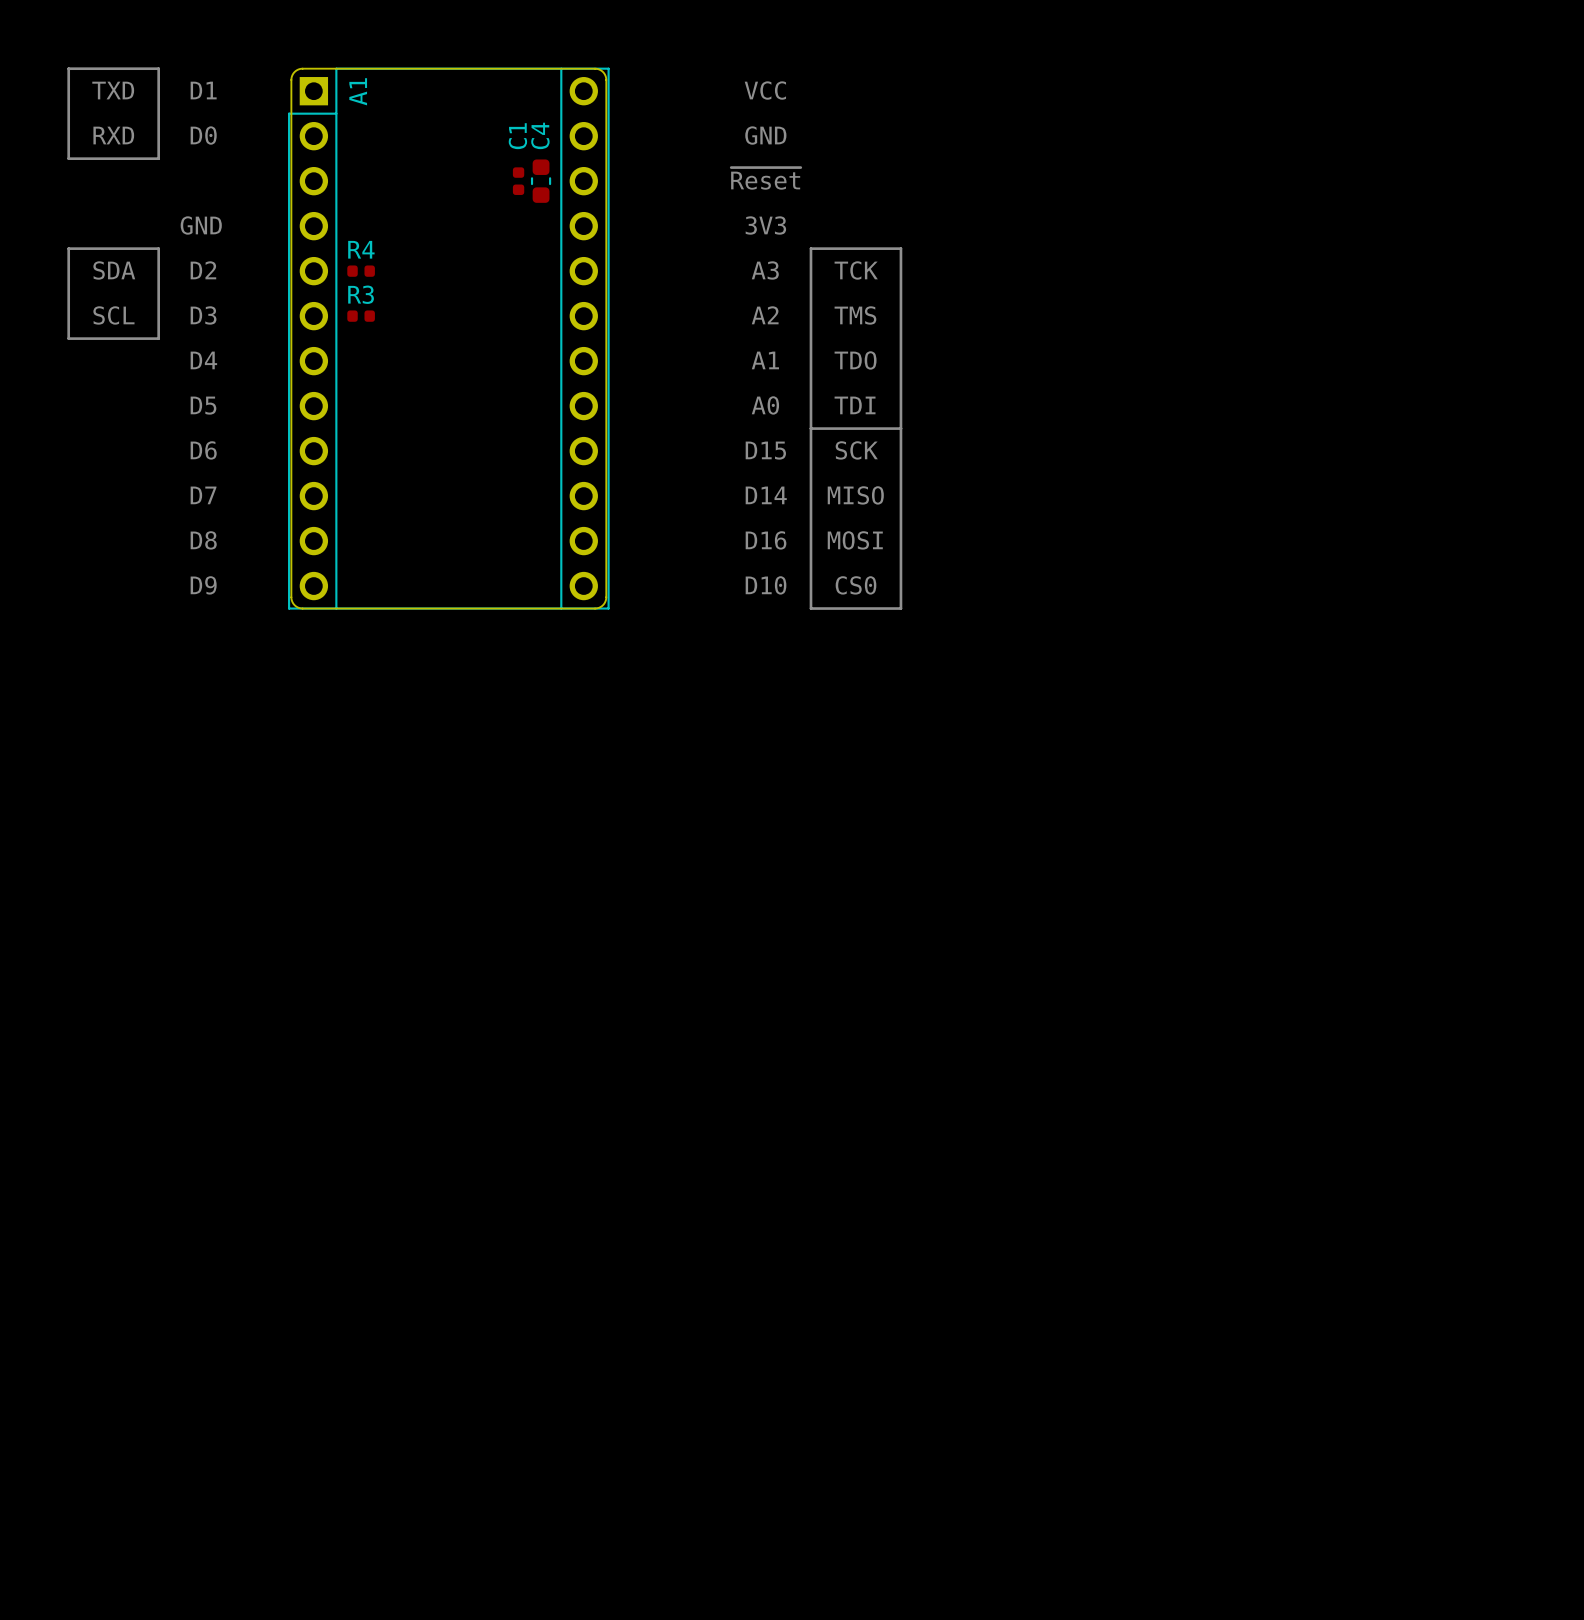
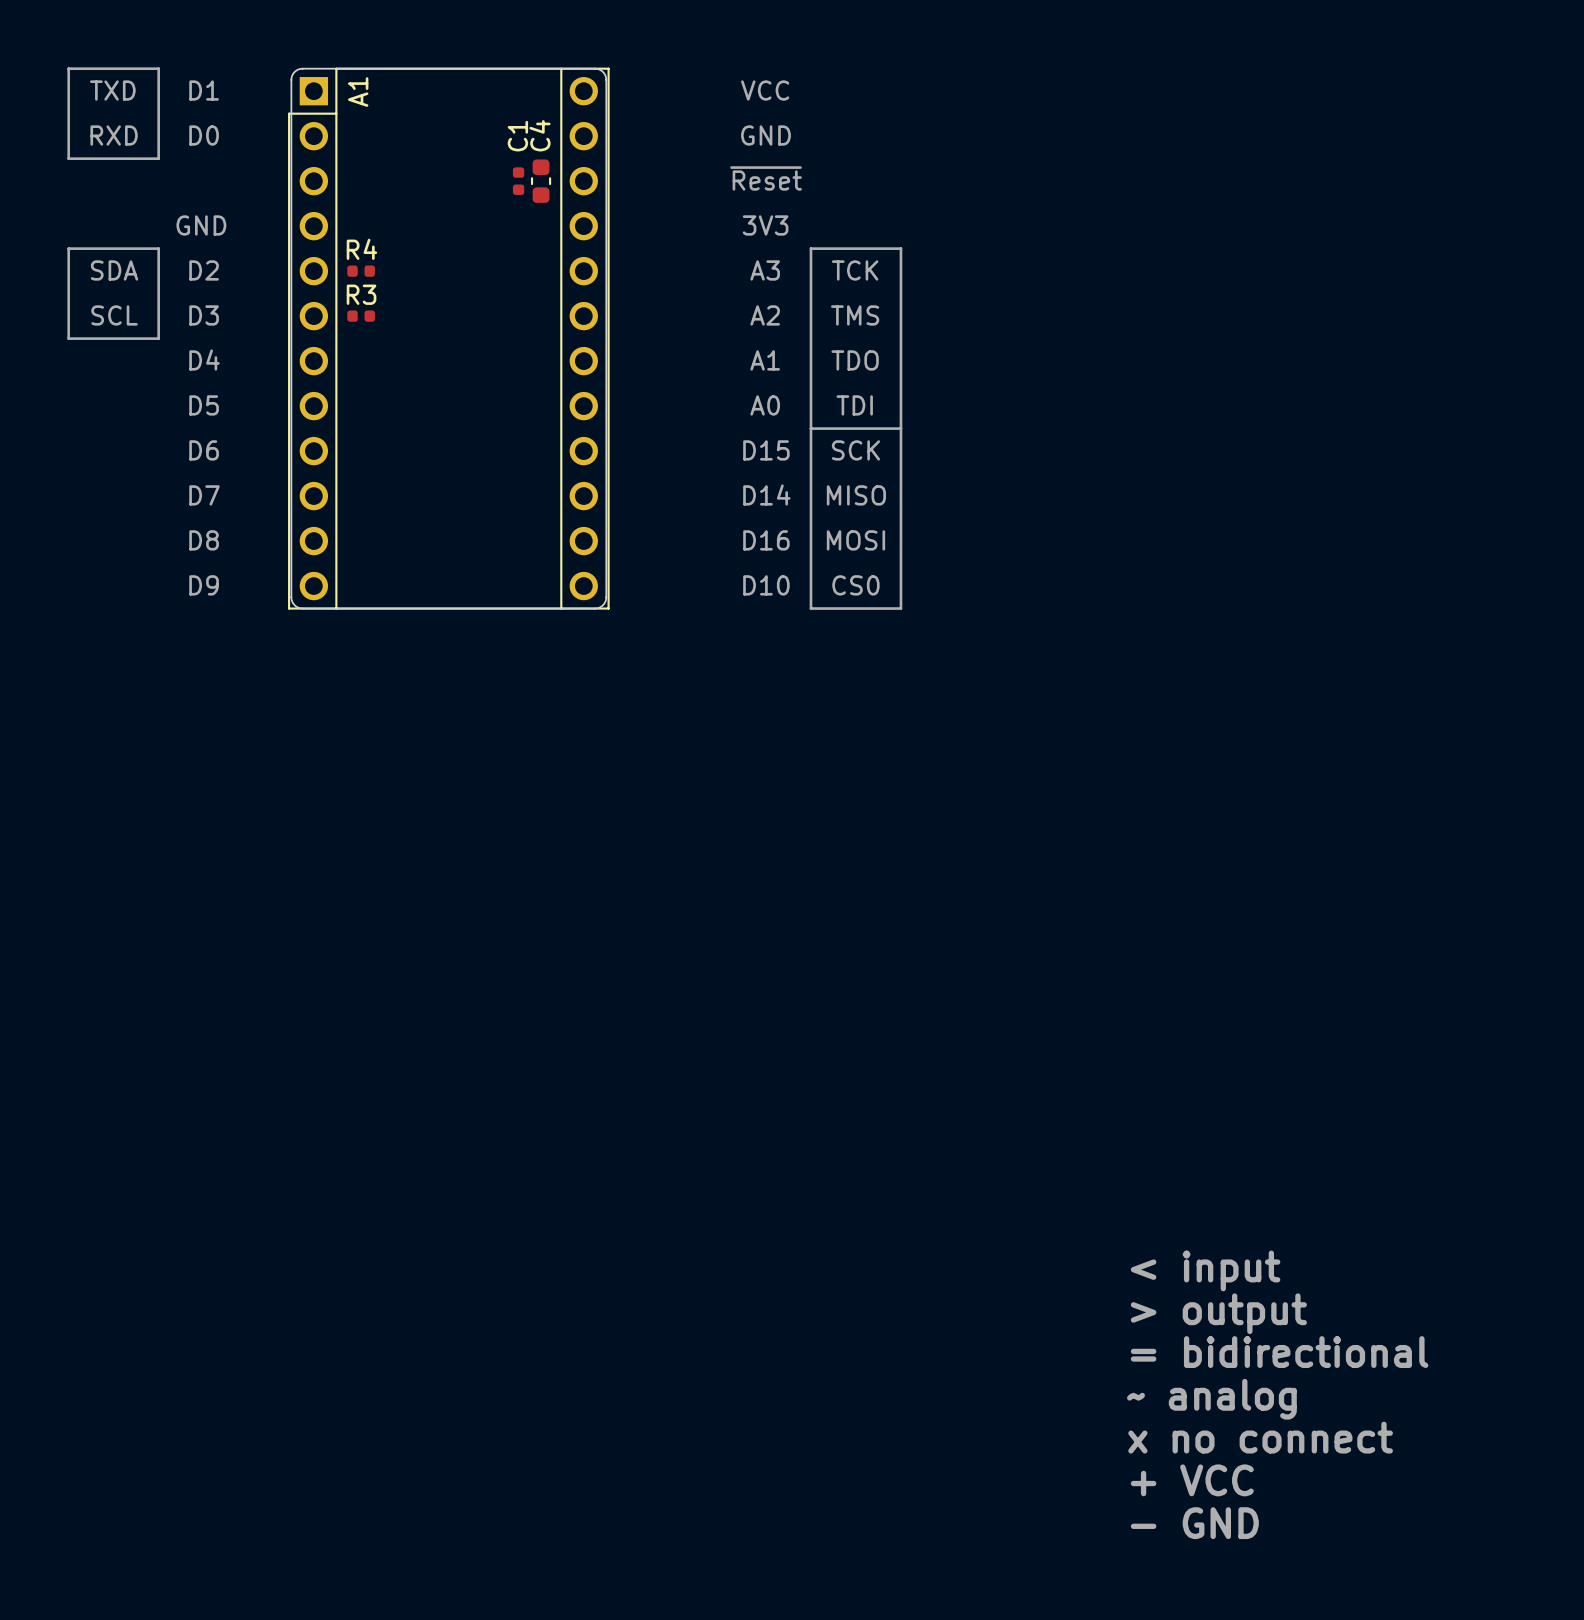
text: none -> < input (1205, 1270)
text: none -> > output (1218, 1313)
text: none -> = bidirectional (1279, 1352)
text: none -> ~ analog (1211, 1399)
text: none -> x no connect (1260, 1437)
text: none -> + VCC (1192, 1480)
text: none -> - GND (1194, 1523)

